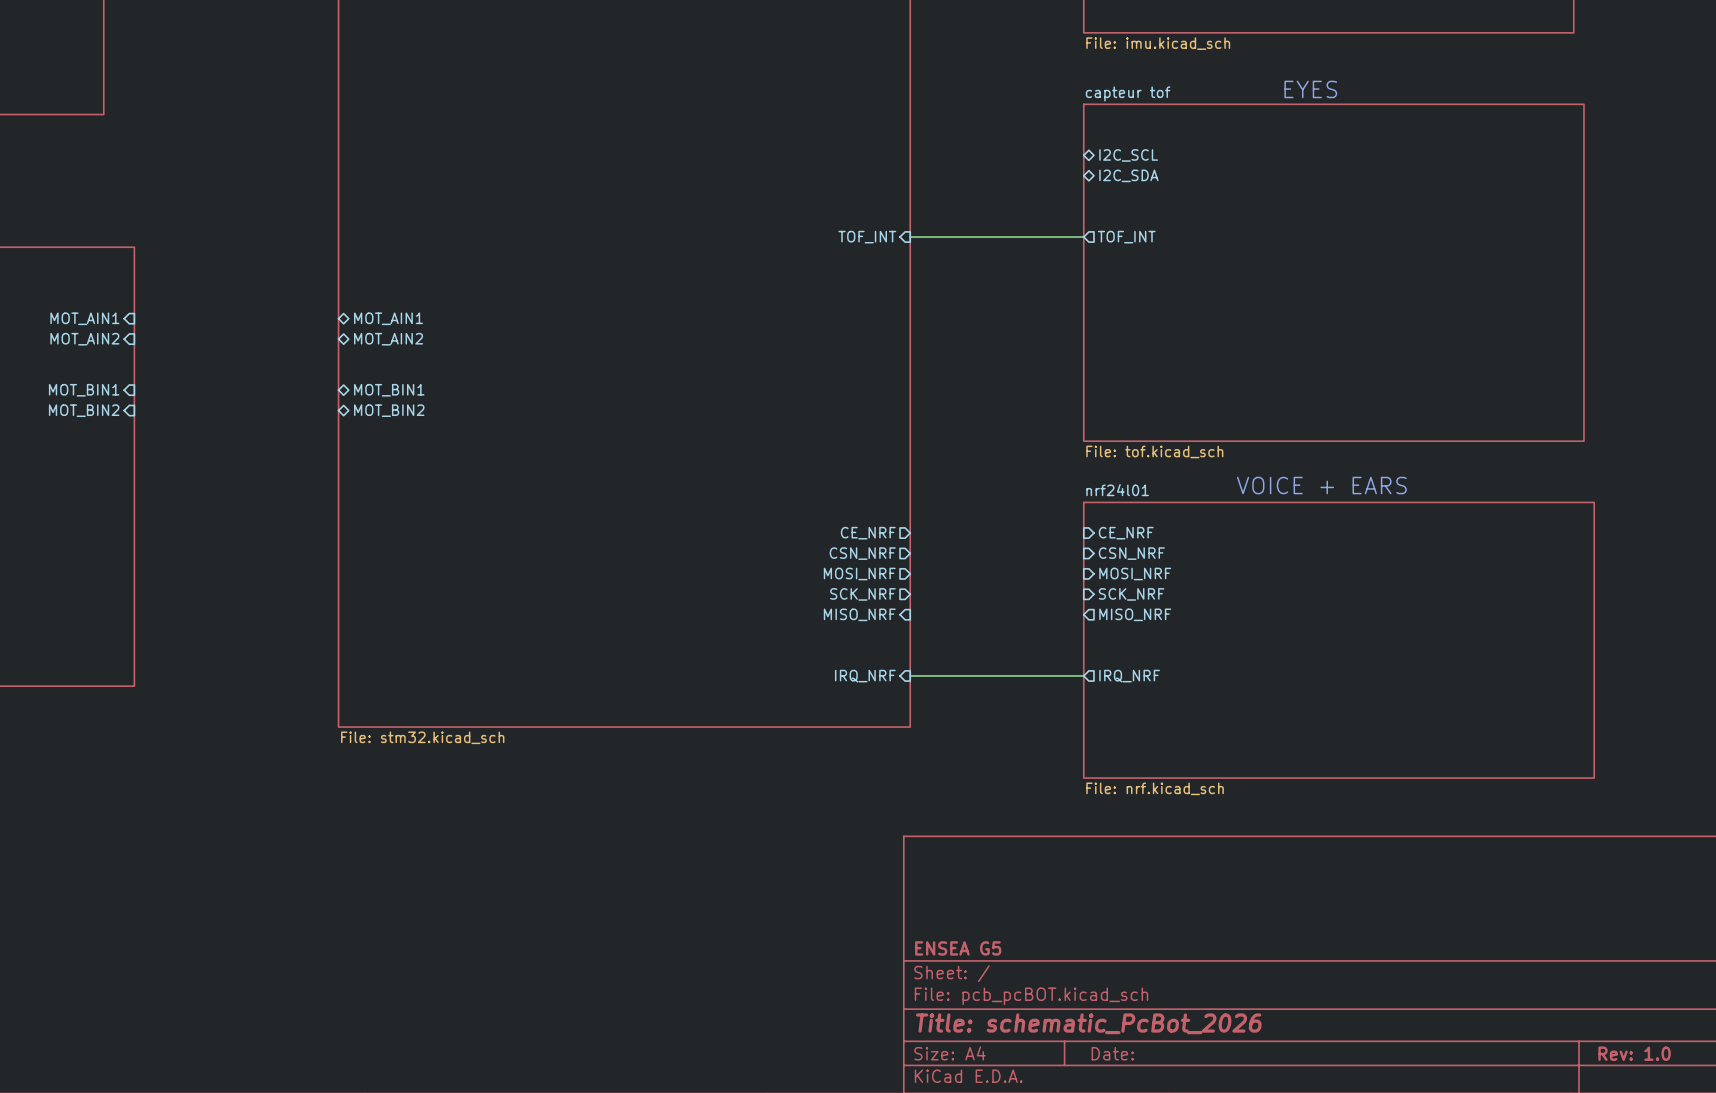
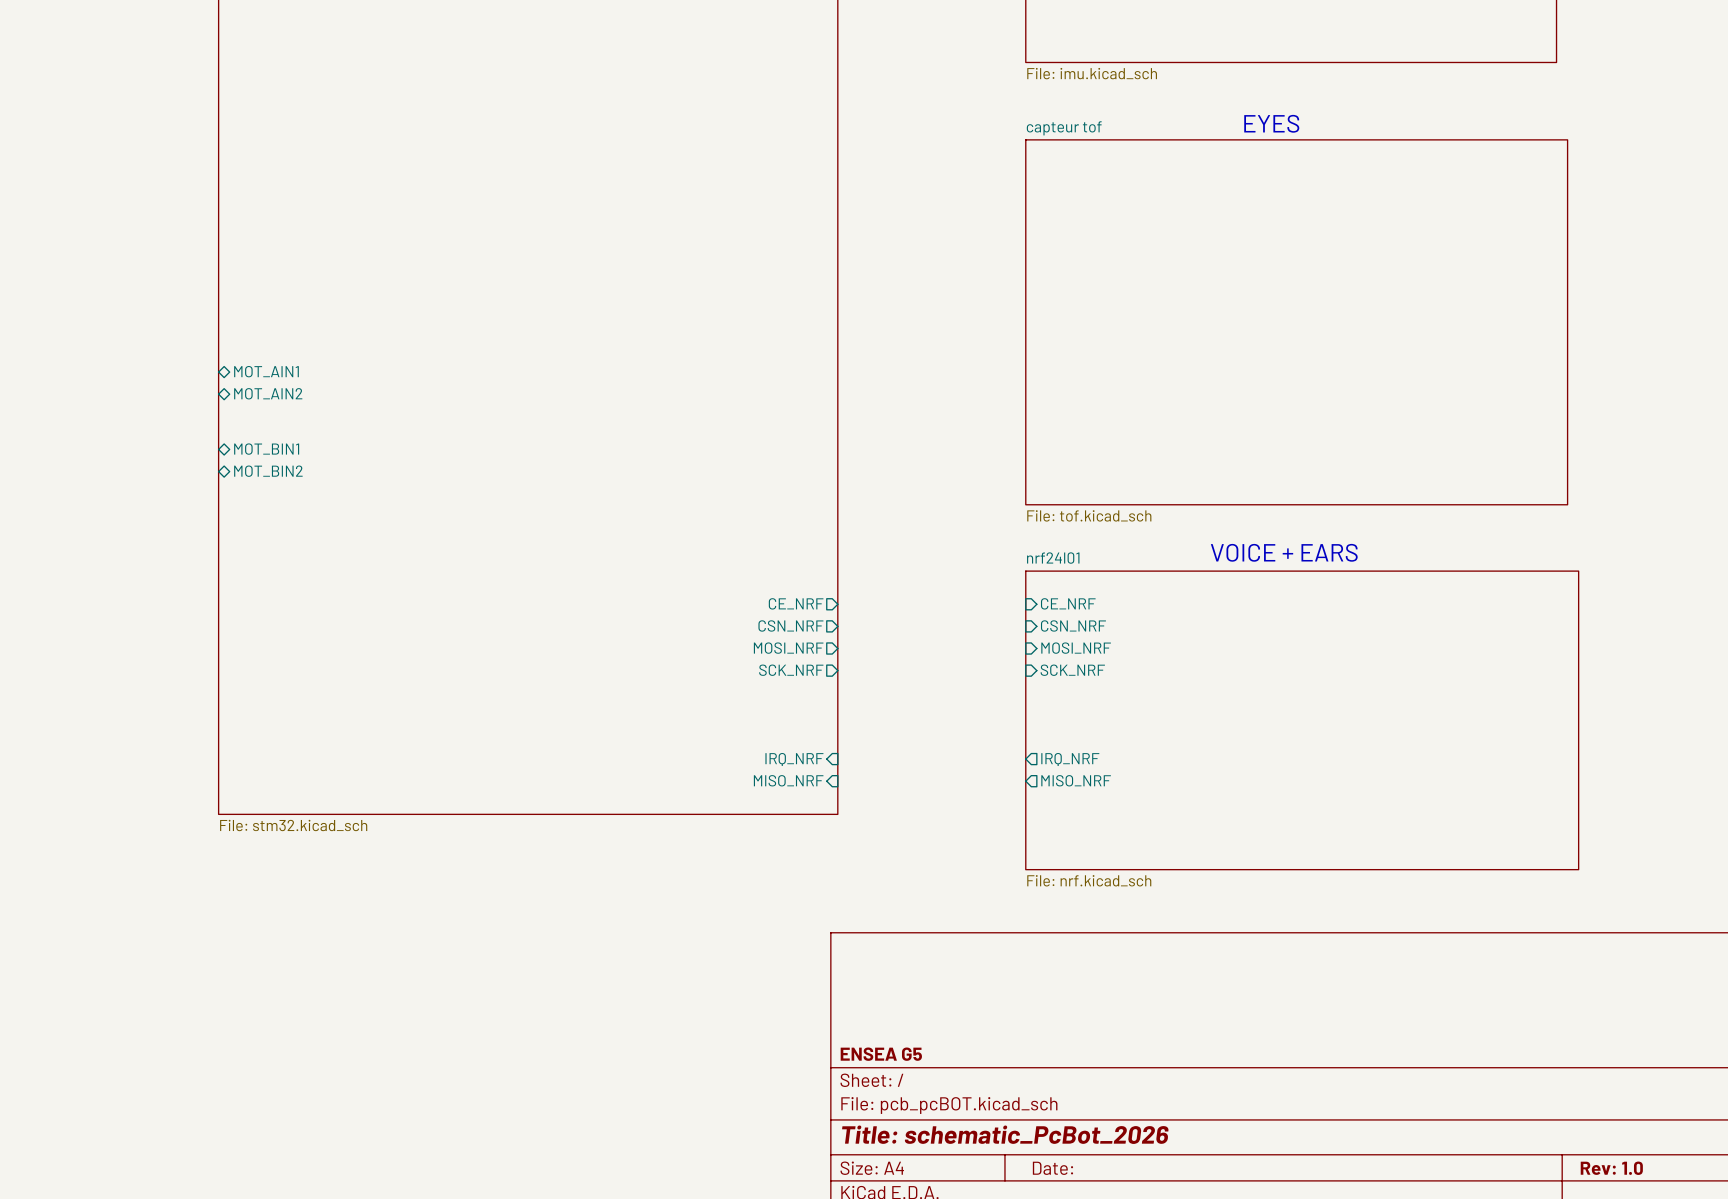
sheet pin: I2C_SCL (1128, 155) -> none
sheet pin: I2C_SDA (1128, 175) -> none
sheet pin: TOF_INT (867, 237) -> none
wire: (910, 237) (1083, 237) -> none
sheet pin: TOF_INT (1126, 237) -> none
sheet pin position: MISO_NRF (859, 614) -> MISO_NRF (788, 780)
sheet pin position: MISO_NRF (1135, 614) -> MISO_NRF (1076, 780)
wire: (910, 675) (1083, 675) -> none

